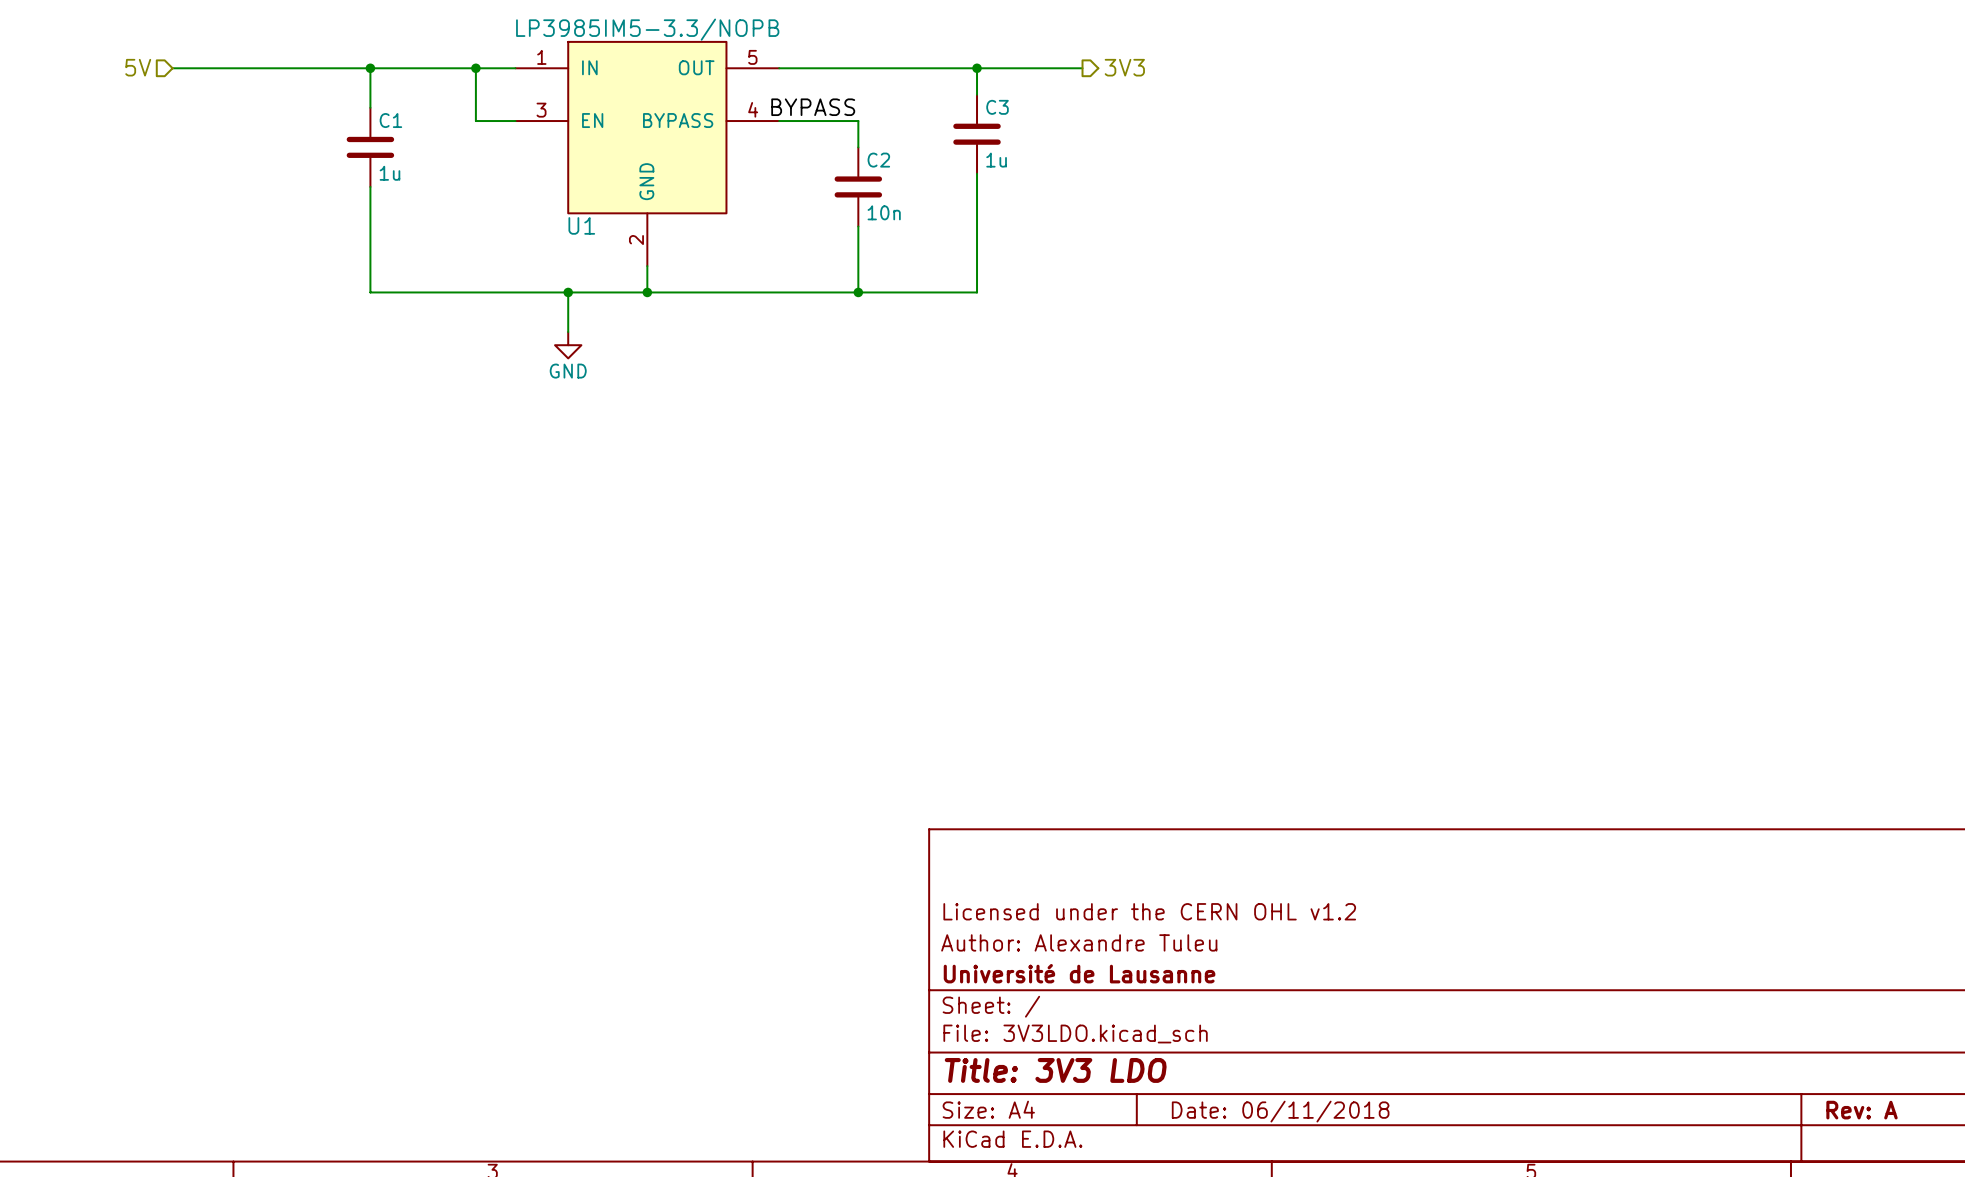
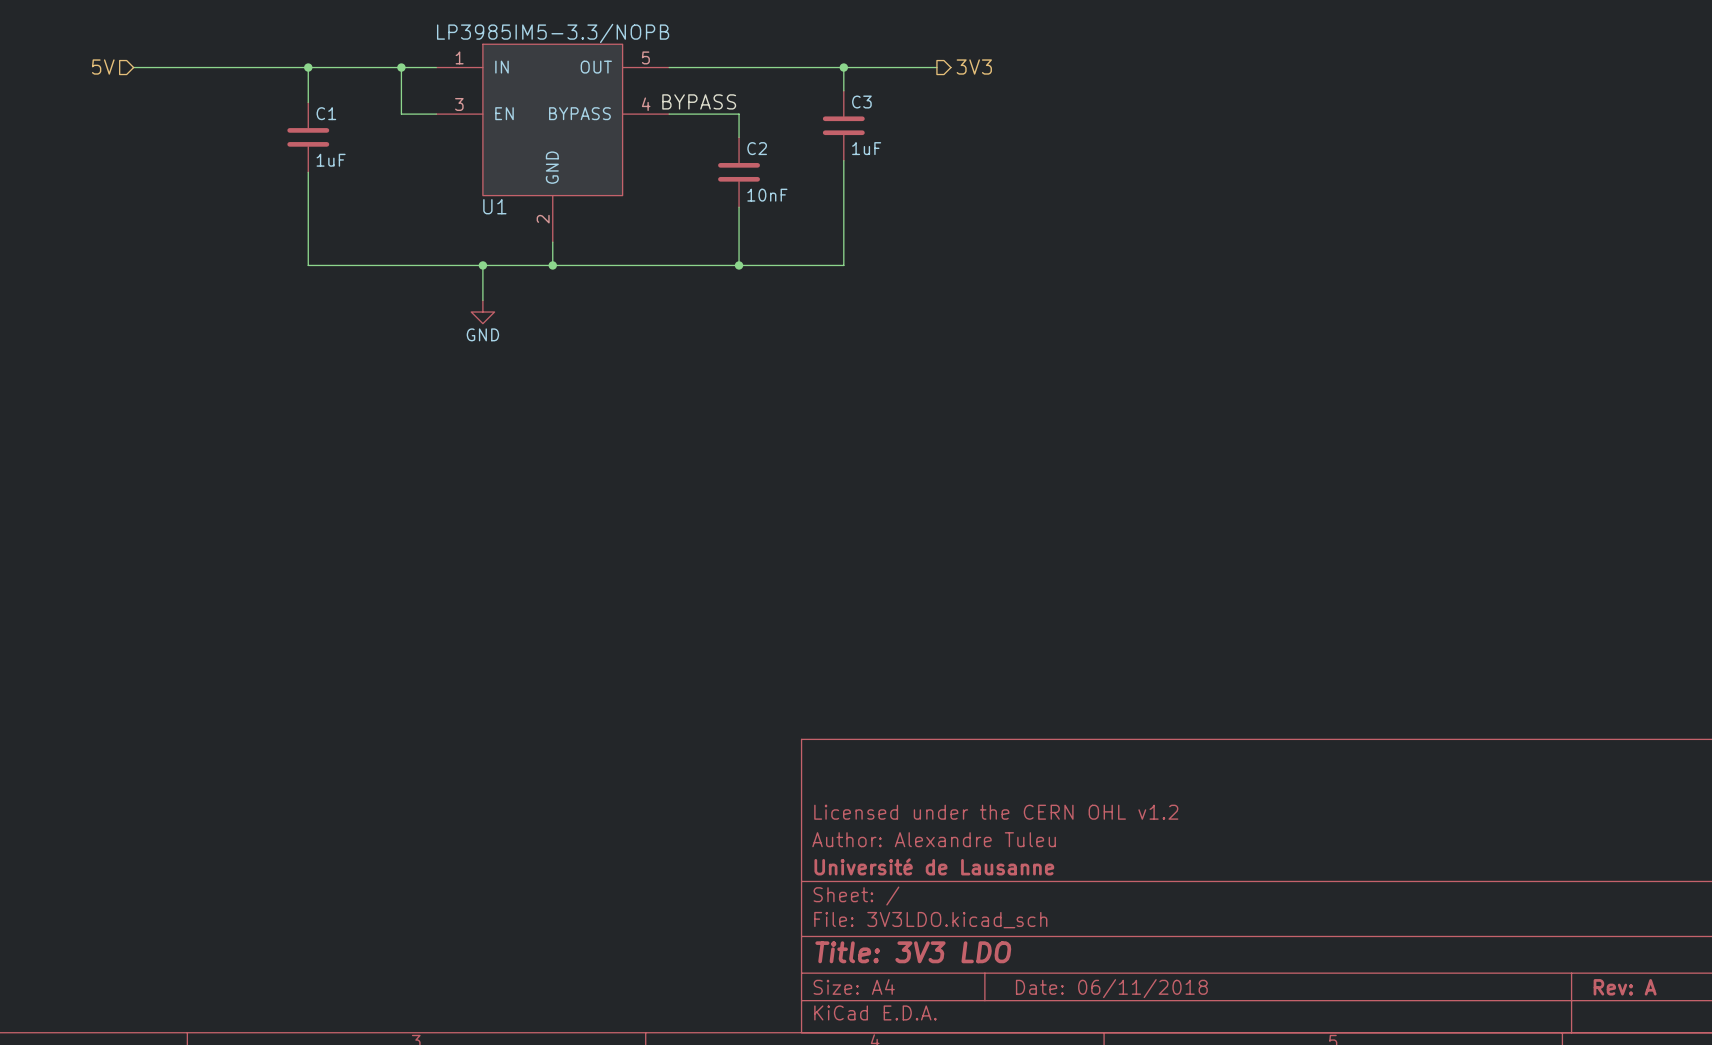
C3 value: 1u (996, 160) -> 1uF (866, 148)
C1 value: 1u (389, 173) -> 1uF (331, 160)
C2 value: 10n (884, 212) -> 10nF (767, 195)

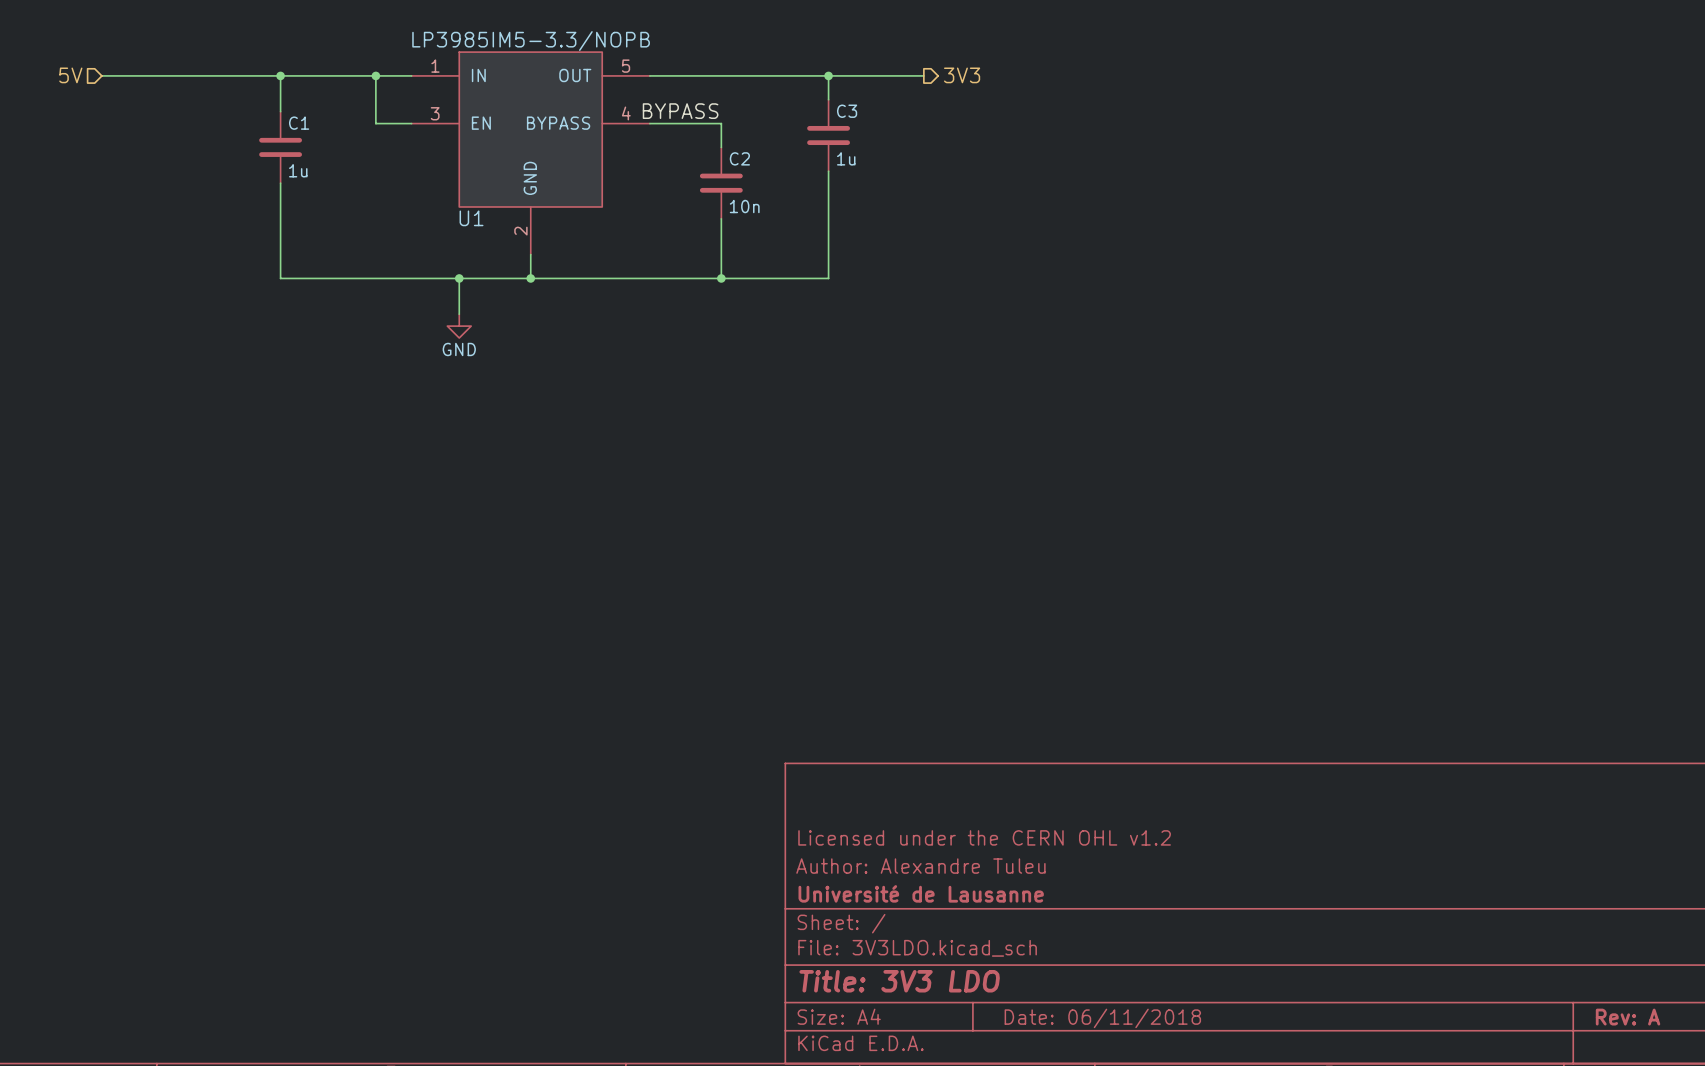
C3 value: 1uF (866, 148) -> 1u (846, 158)
C1 value: 1uF (331, 160) -> 1u (298, 170)
C2 value: 10nF (767, 195) -> 10n (744, 206)

